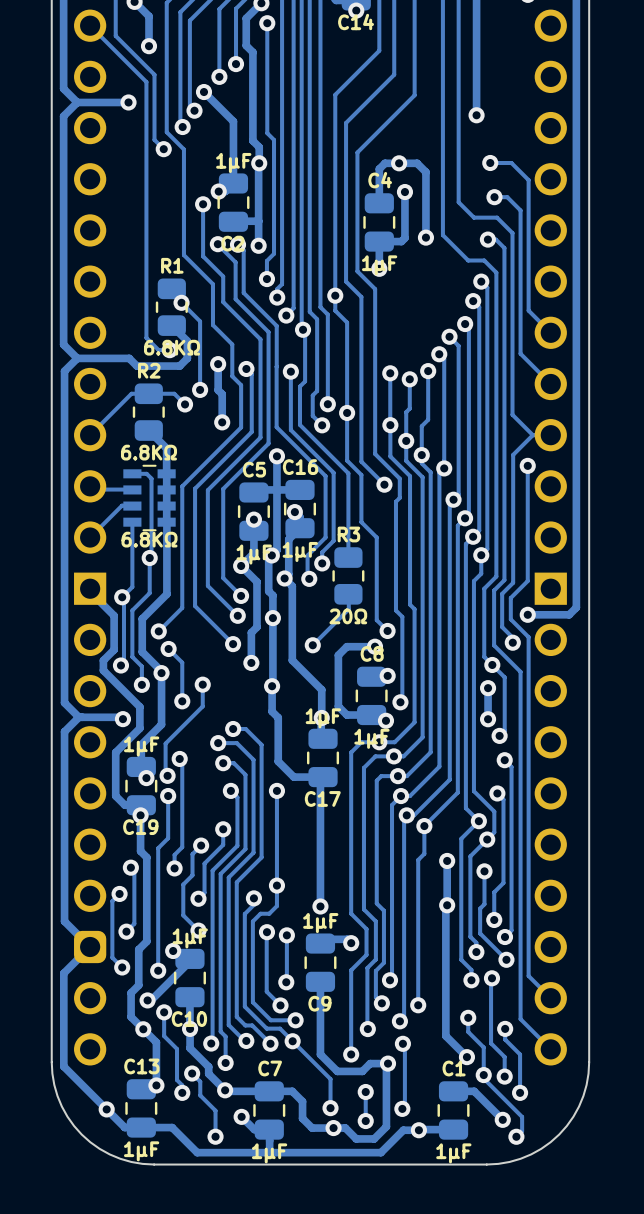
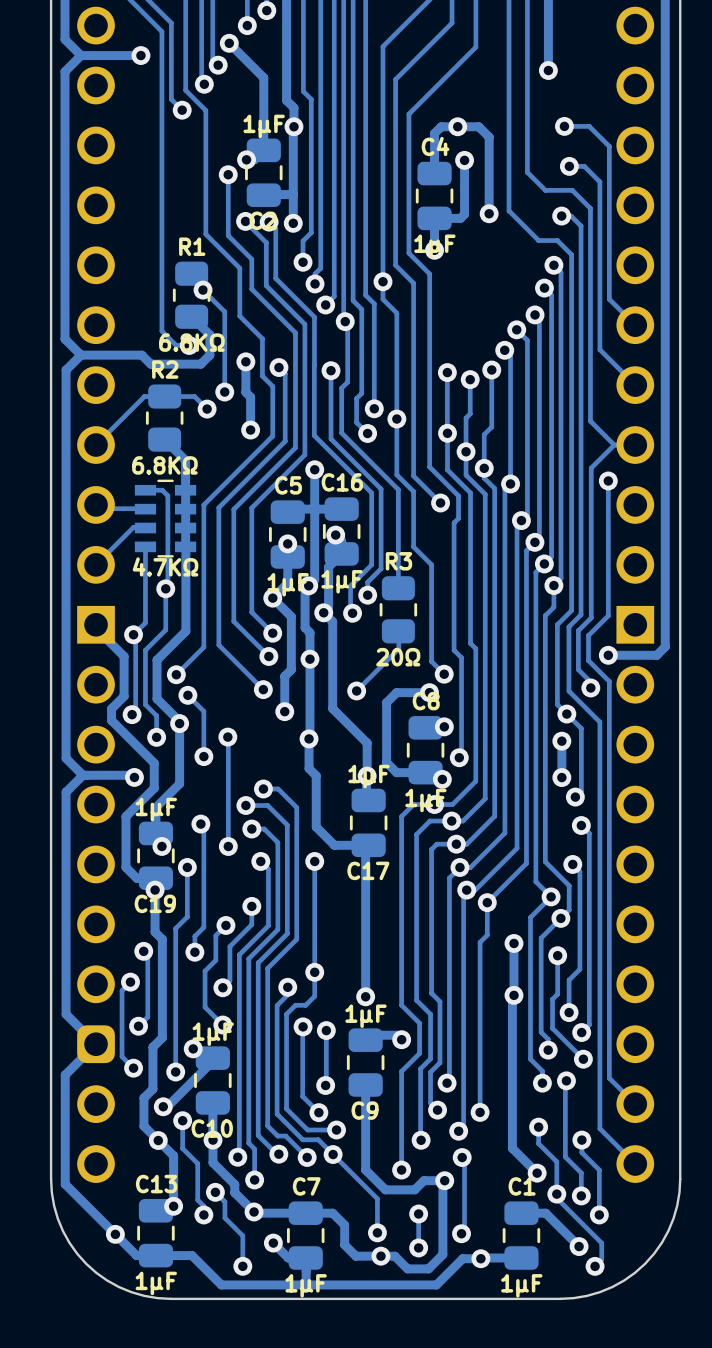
part text: 6.8KΩ (149, 539) -> 4.7KΩ (165, 566)
track: (202, 684) (202, 706) (165, 743) (165, 773) (167, 775) -> (227, 737) (228, 846)
via position: (167, 775) -> (228, 846)

